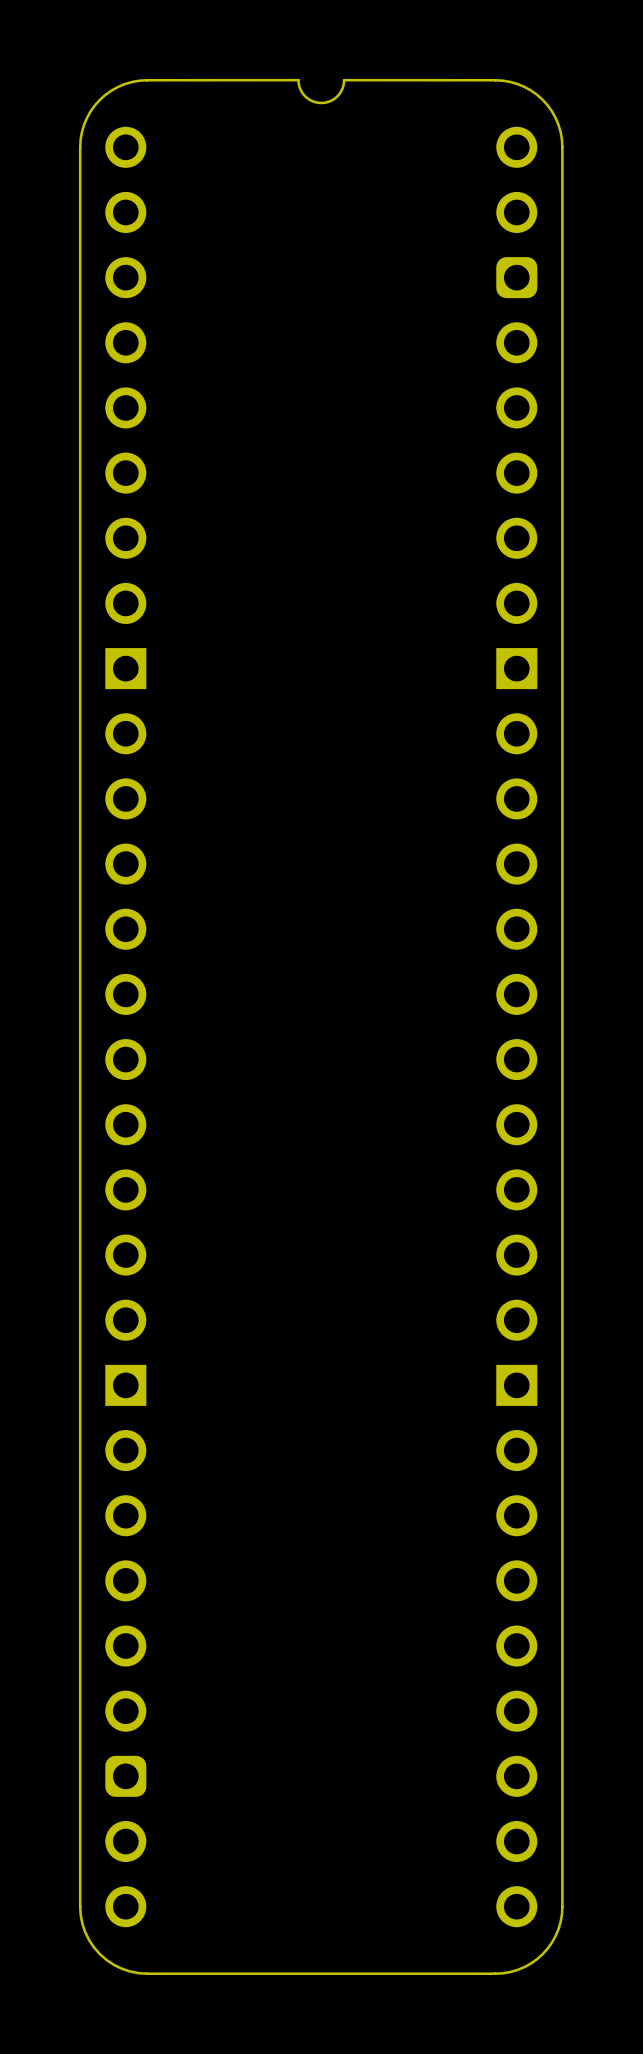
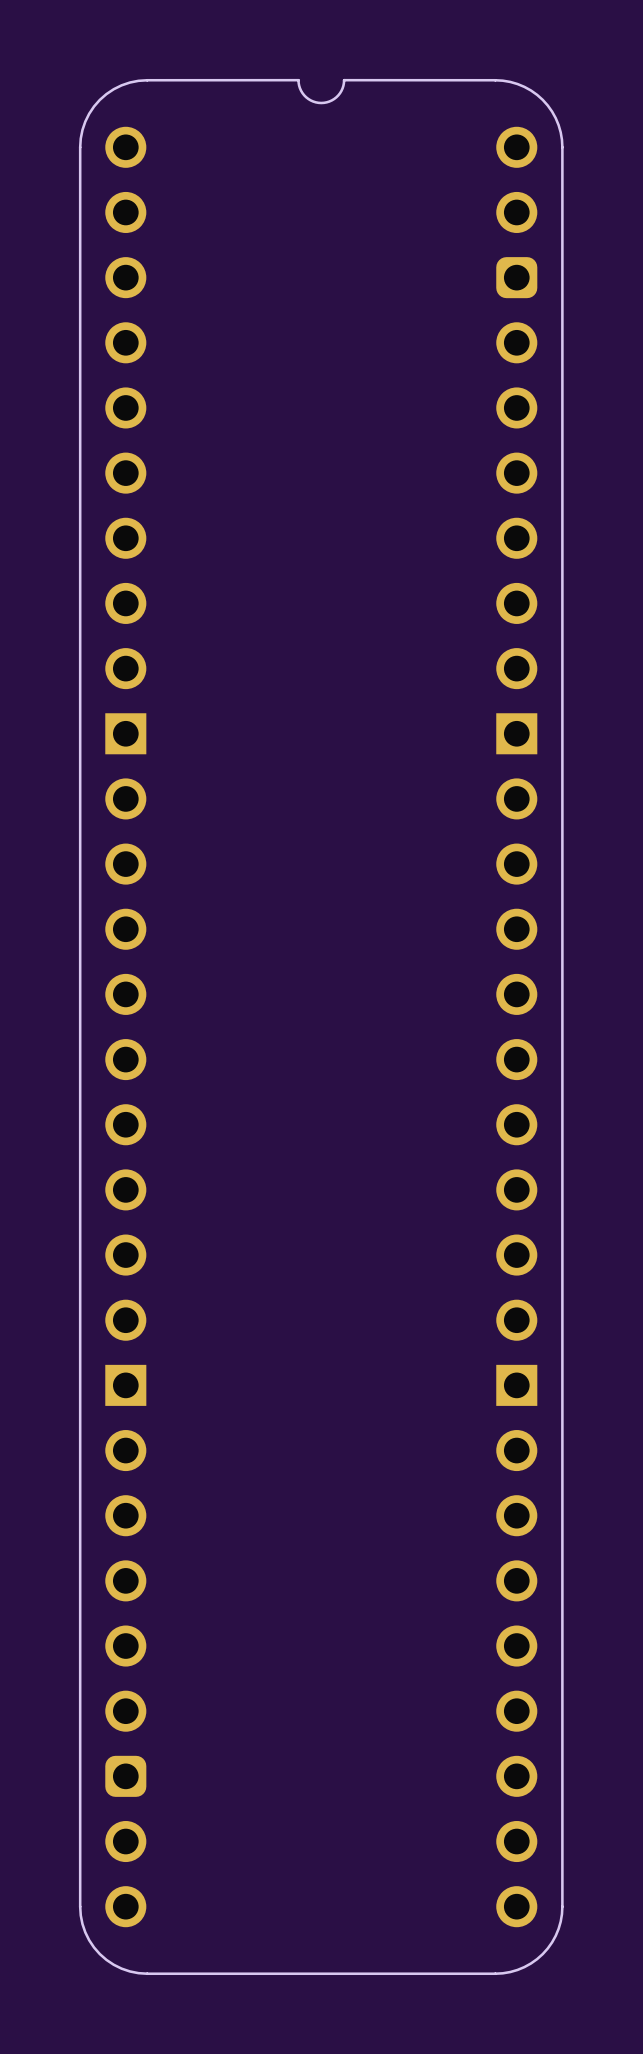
part footprint: [78, 78, 564, 1976] -> [78, 78, 564, 1976]

